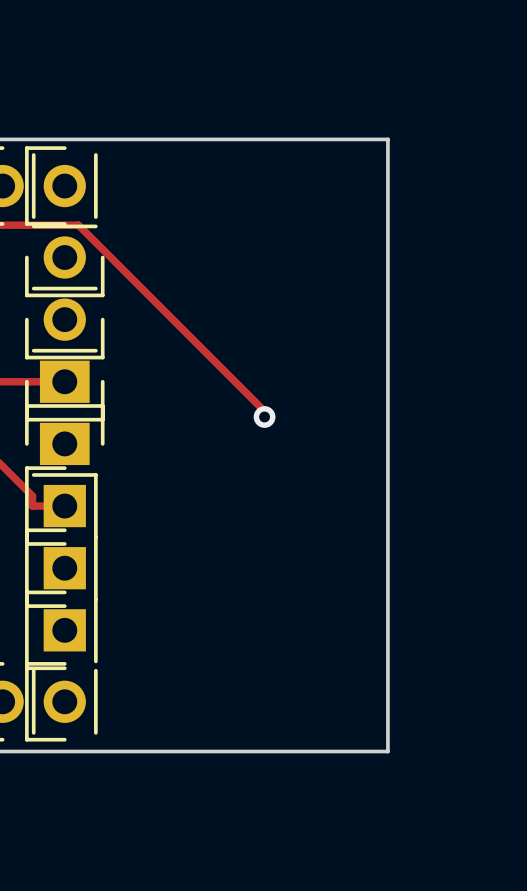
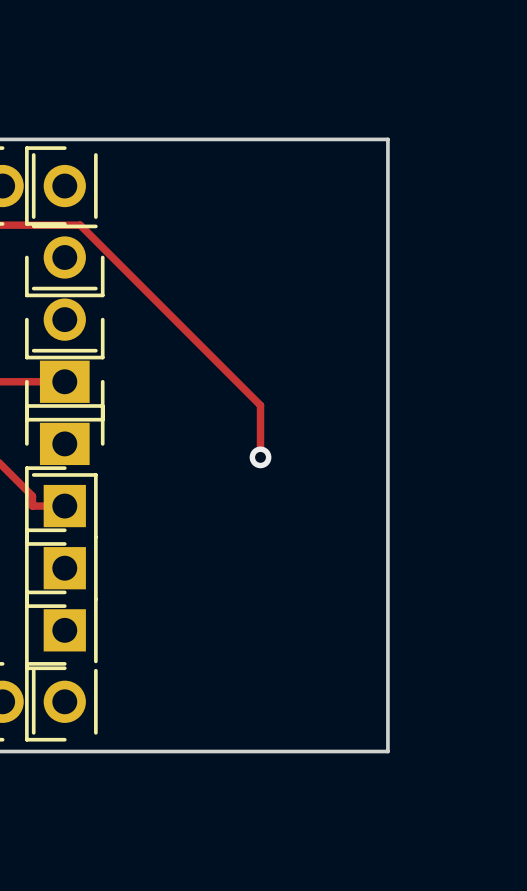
track: (78, 225) (264, 411) (264, 416) -> (78, 225) (260, 405) (260, 457)
via position: (264, 416) -> (260, 457)

